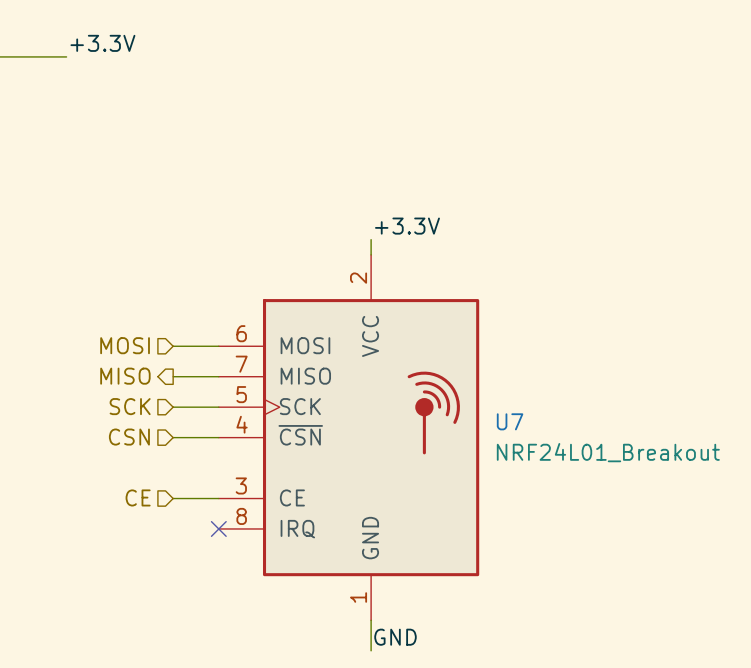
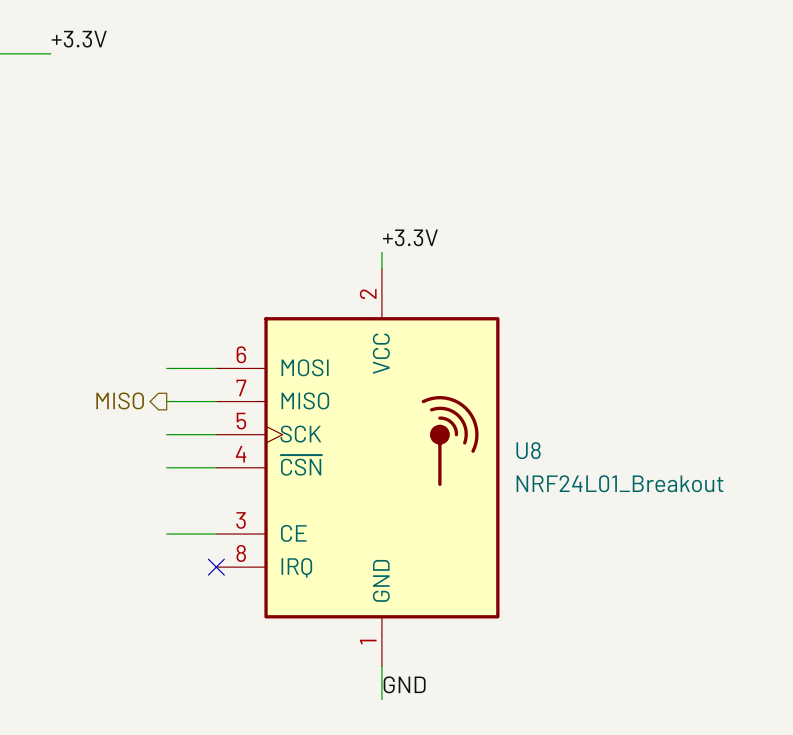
hierarchical label: MOSI (125, 345) -> none
hierarchical label: SCK (130, 406) -> none
U7 name: U7 (510, 421) -> U8 (528, 450)
hierarchical label: CSN (129, 437) -> none
hierarchical label: CE (138, 497) -> none

